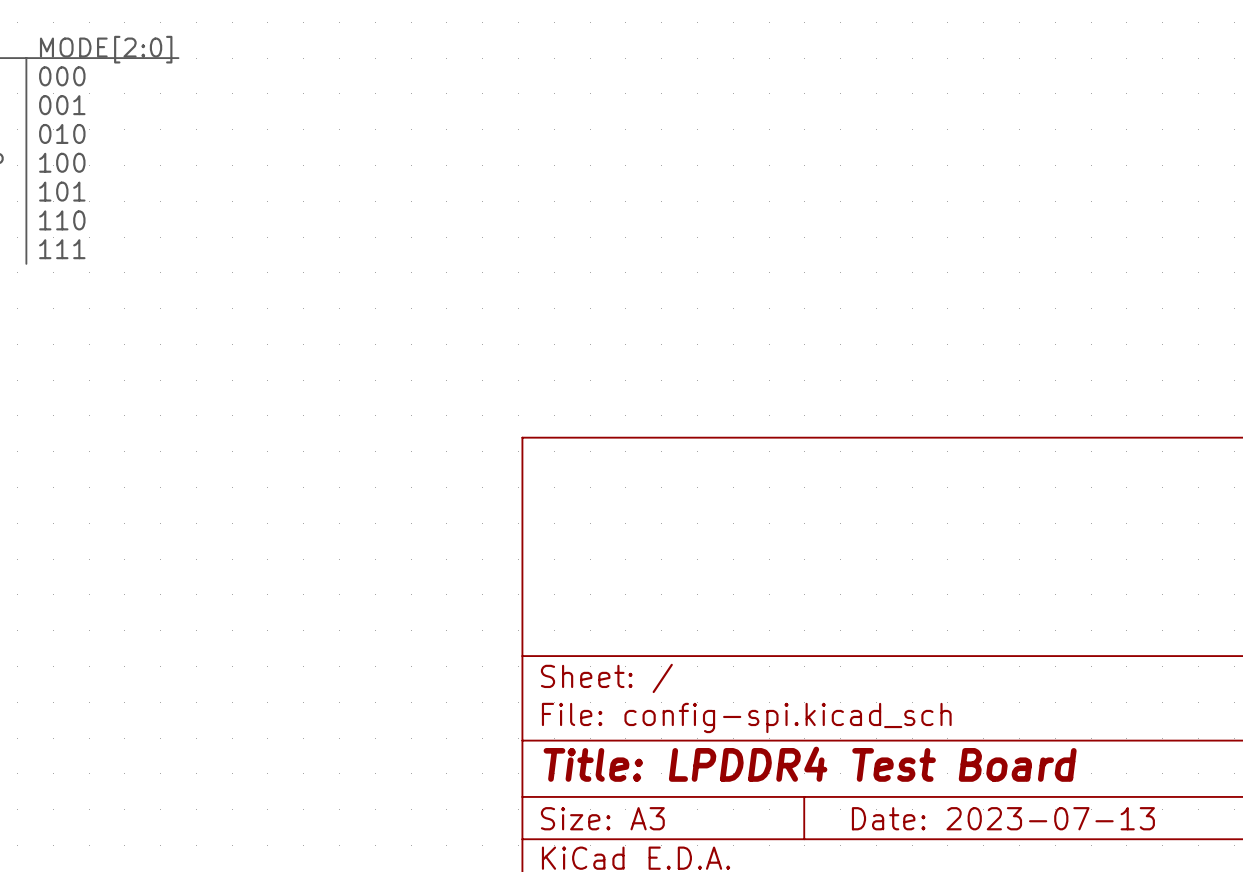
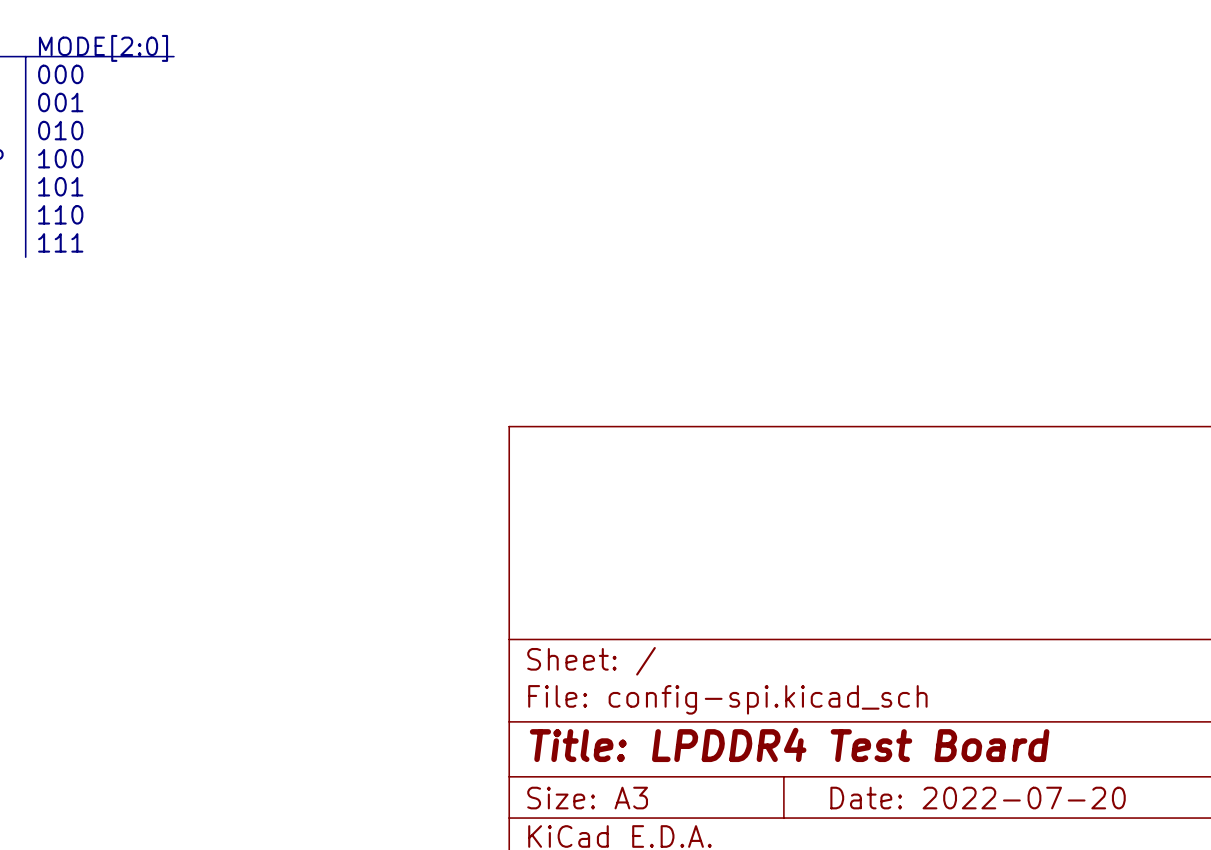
title block: Date: 2023-07-13 (1003, 818) -> Date: 2022-07-20 (978, 798)

